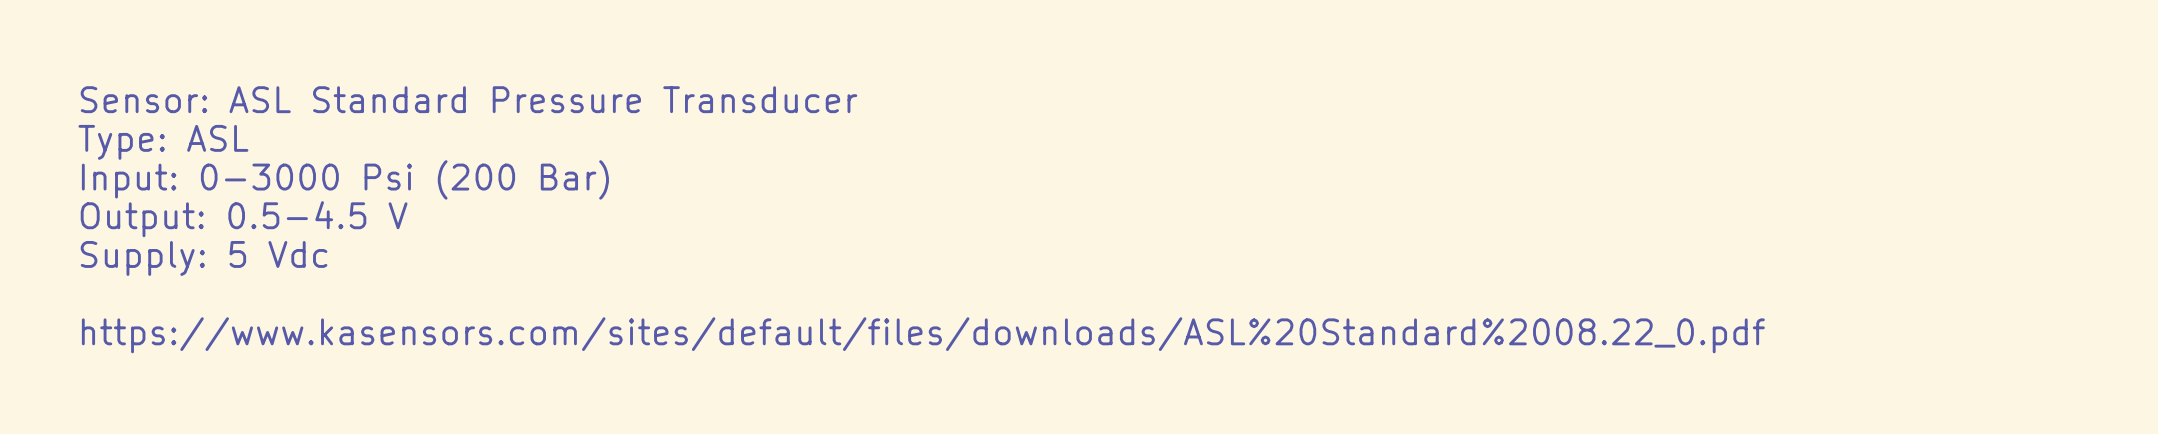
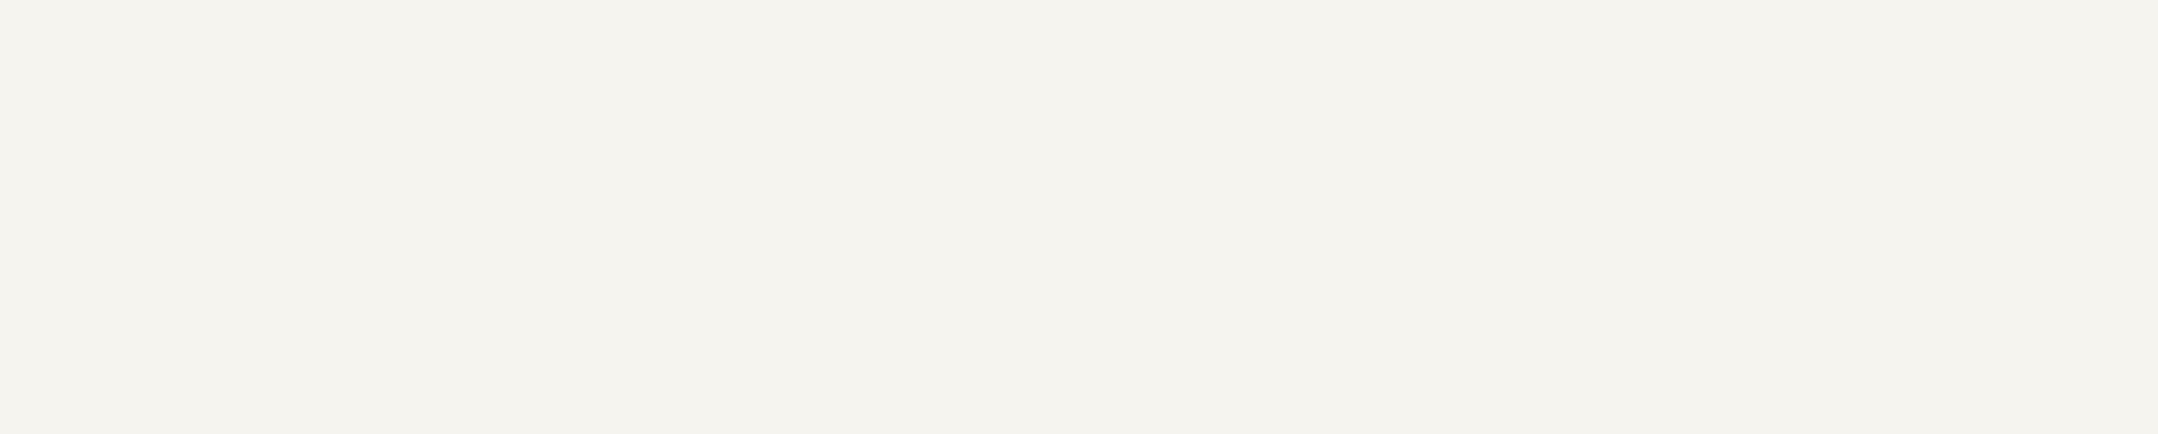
text: Sensor: ASL Standard Pressure Transducer (469, 99) -> none
text: Type: ASL (163, 142) -> none
text: Input: 0-3000 Psi (200 Bar) (345, 179) -> none
text: Output: 0.5-4.5 V (244, 219) -> none
text: Supply: 5 Vdc (204, 258) -> none
text: https://www.kasensors.com/sites/default/files/downloads/ASL%20Standard%2008.22_0.pdf (923, 335) -> none

